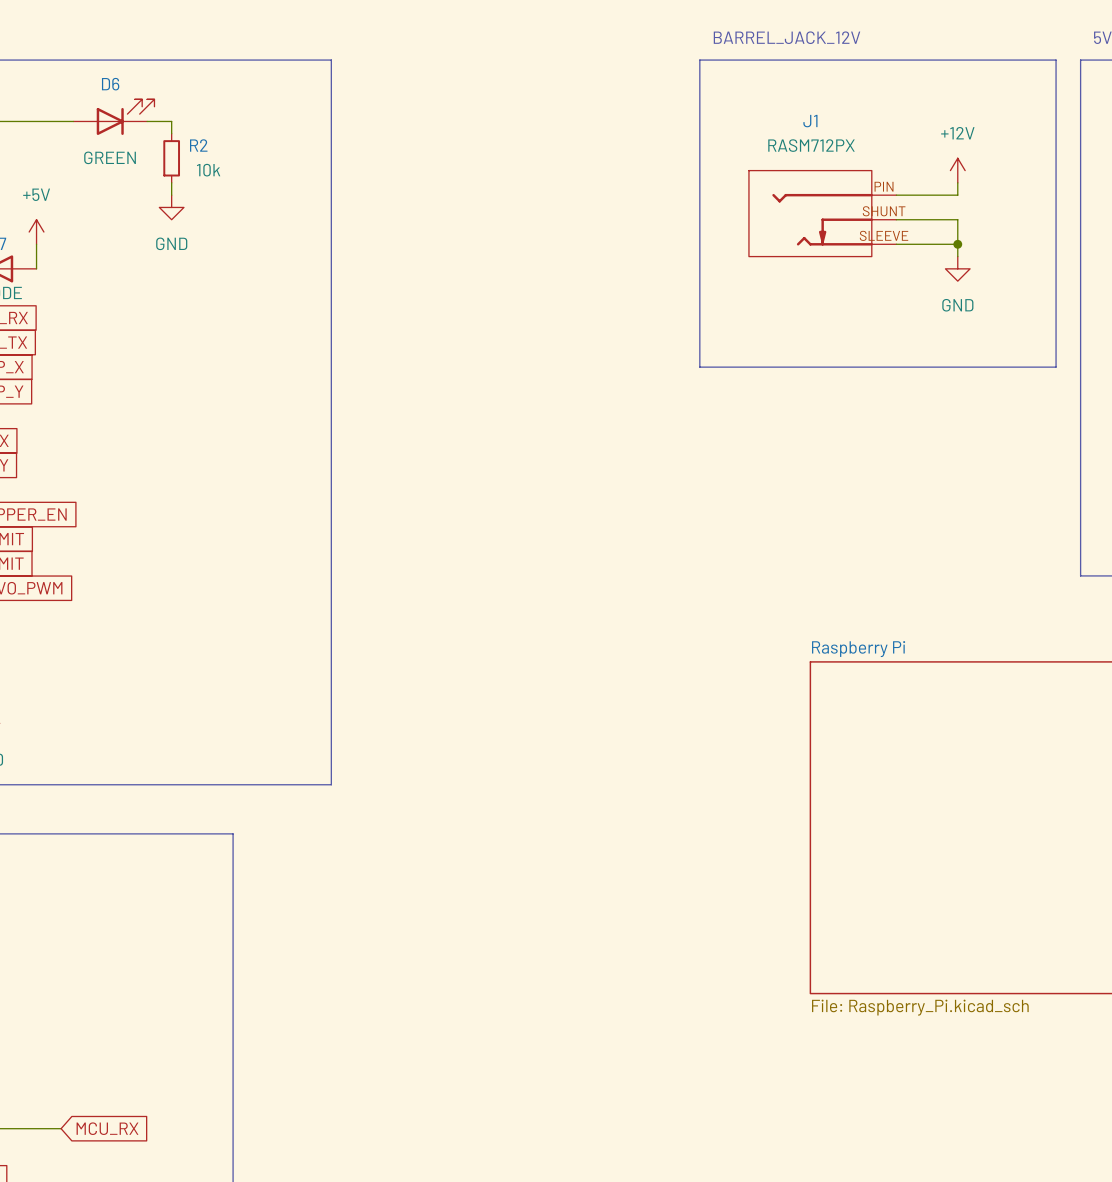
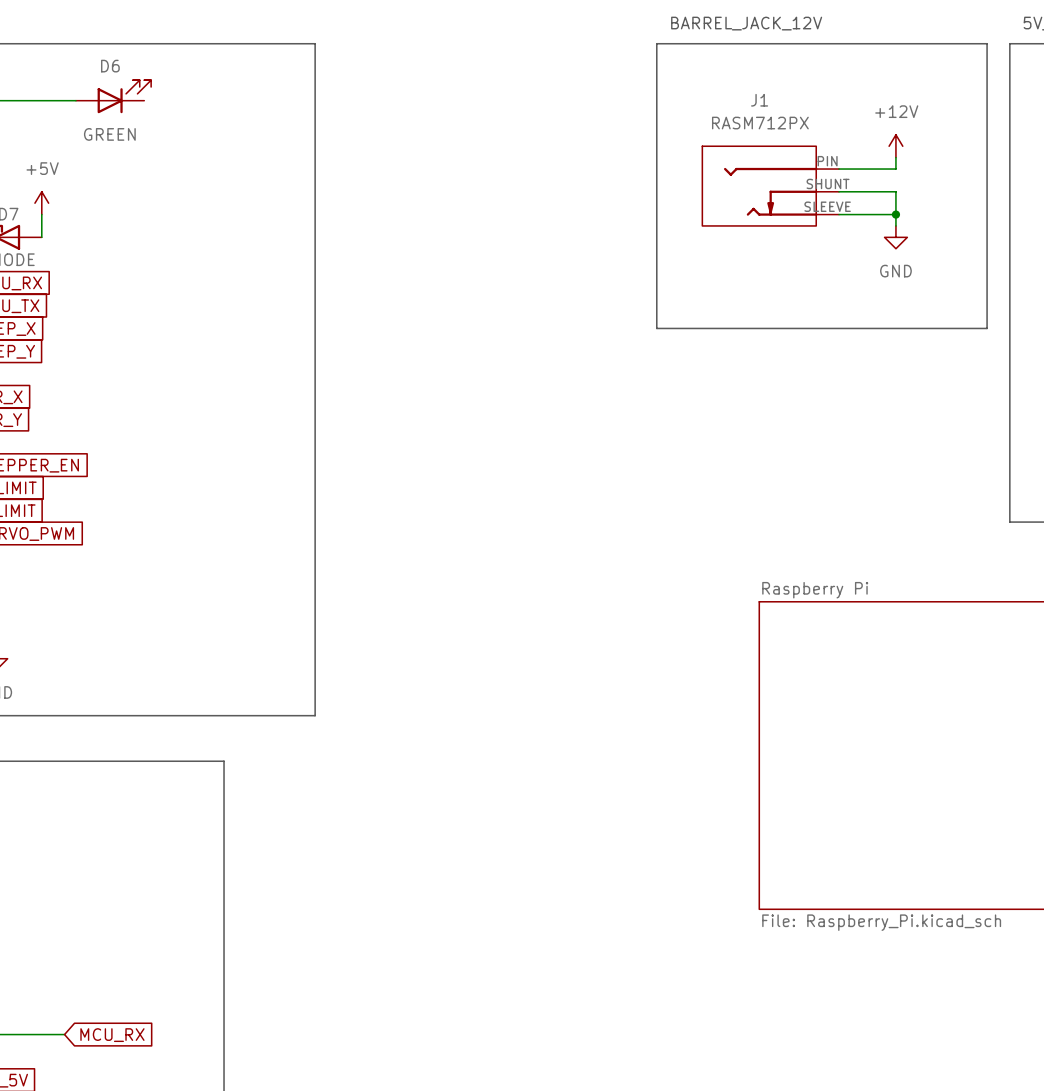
wire: (147, 121) (171, 121) (171, 133) -> none
R2: 10k (171, 158) -> none
wire: (171, 182) (171, 195) -> none
power symbol: GND (171, 207) -> none

